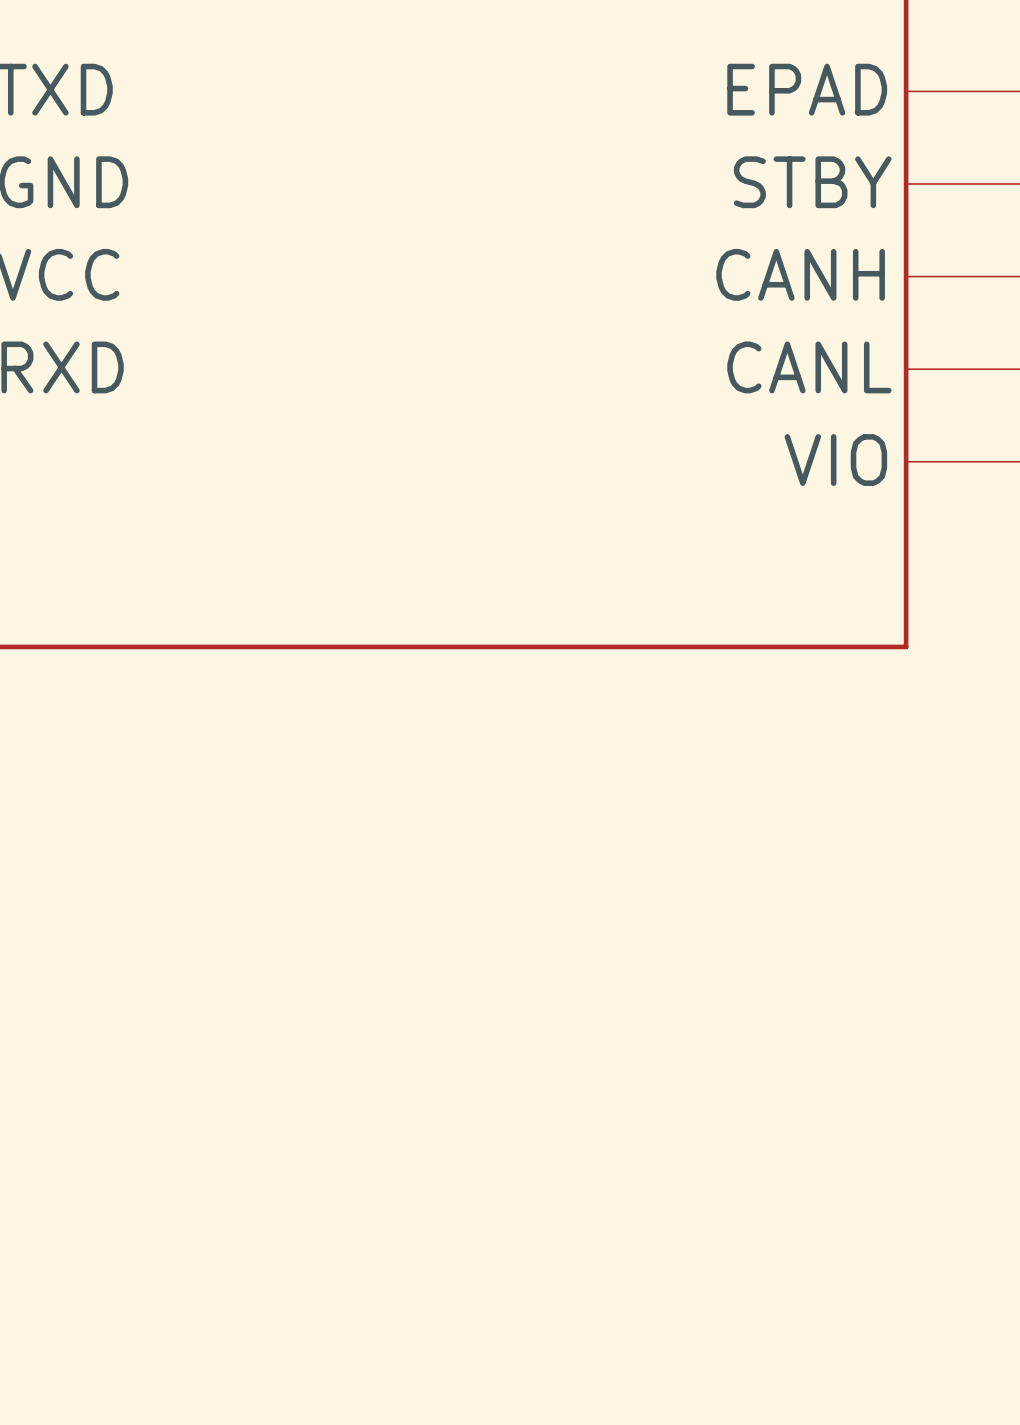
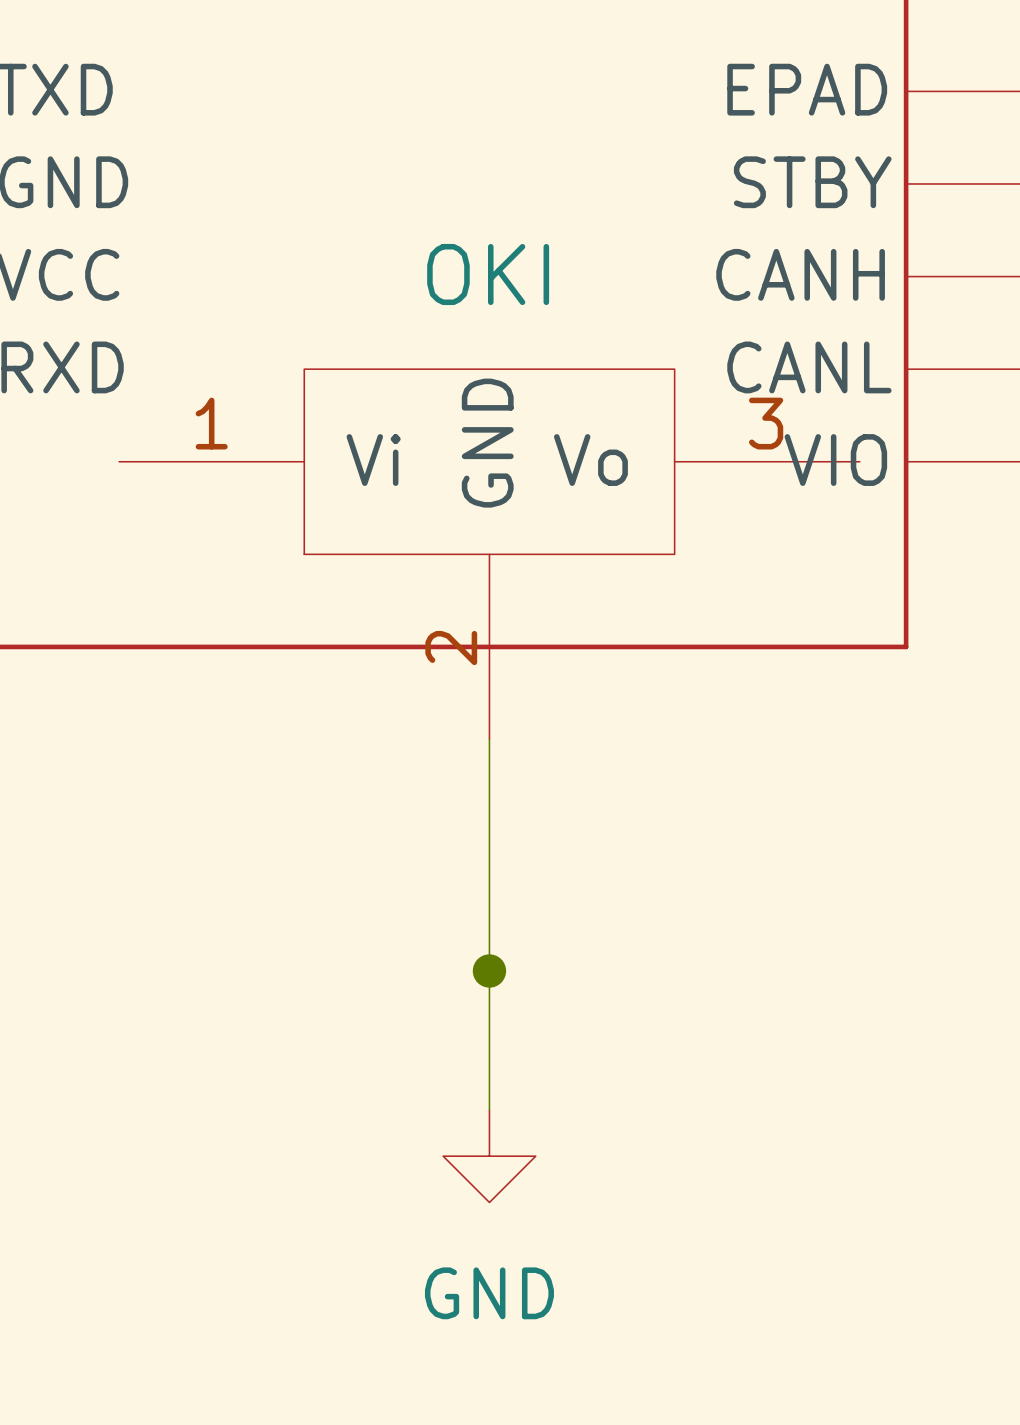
part: none -> OKI (489, 554)
wire: none -> (489, 739) (489, 1109)
junction: none -> (489, 970)
power symbol: none -> GND (489, 1156)

